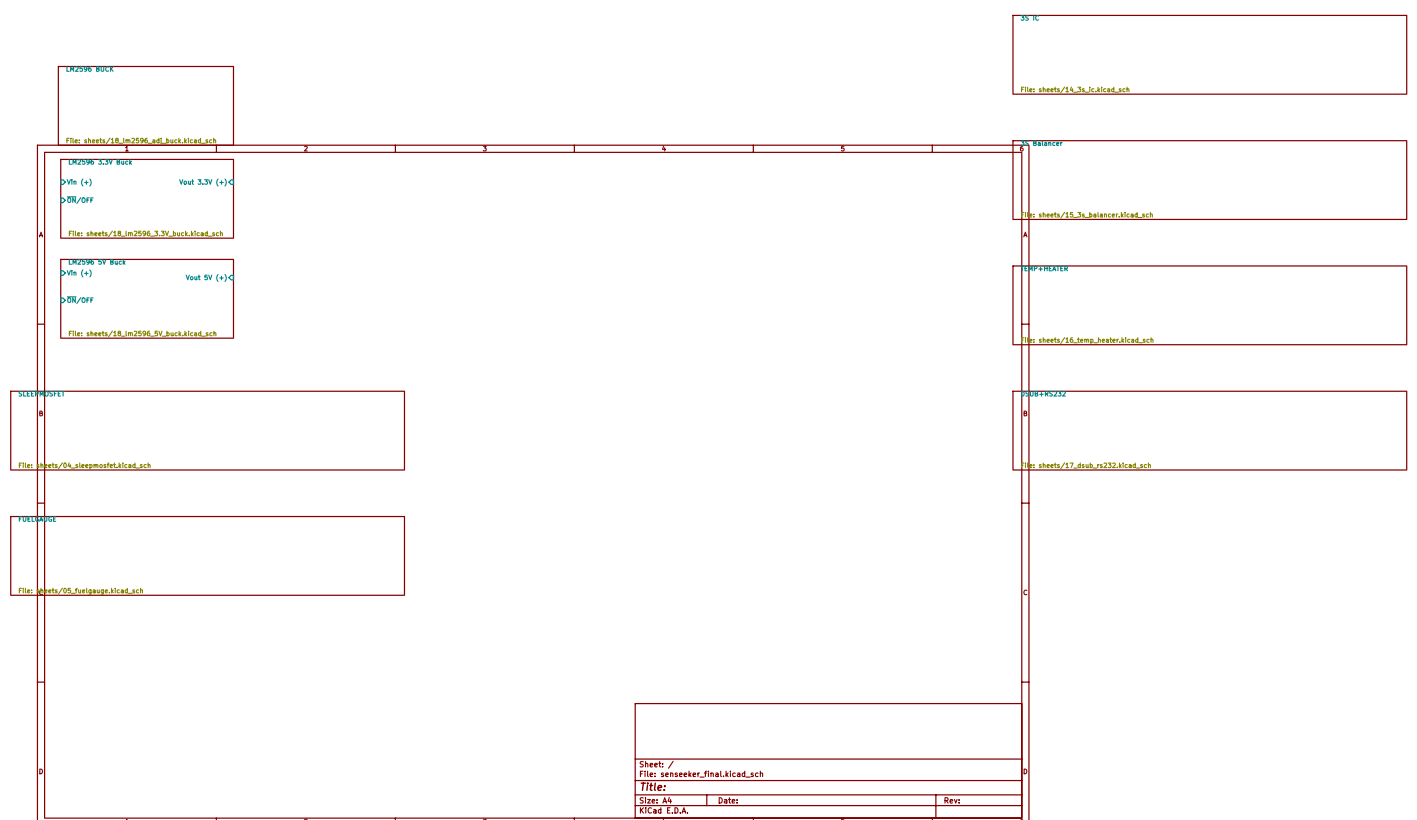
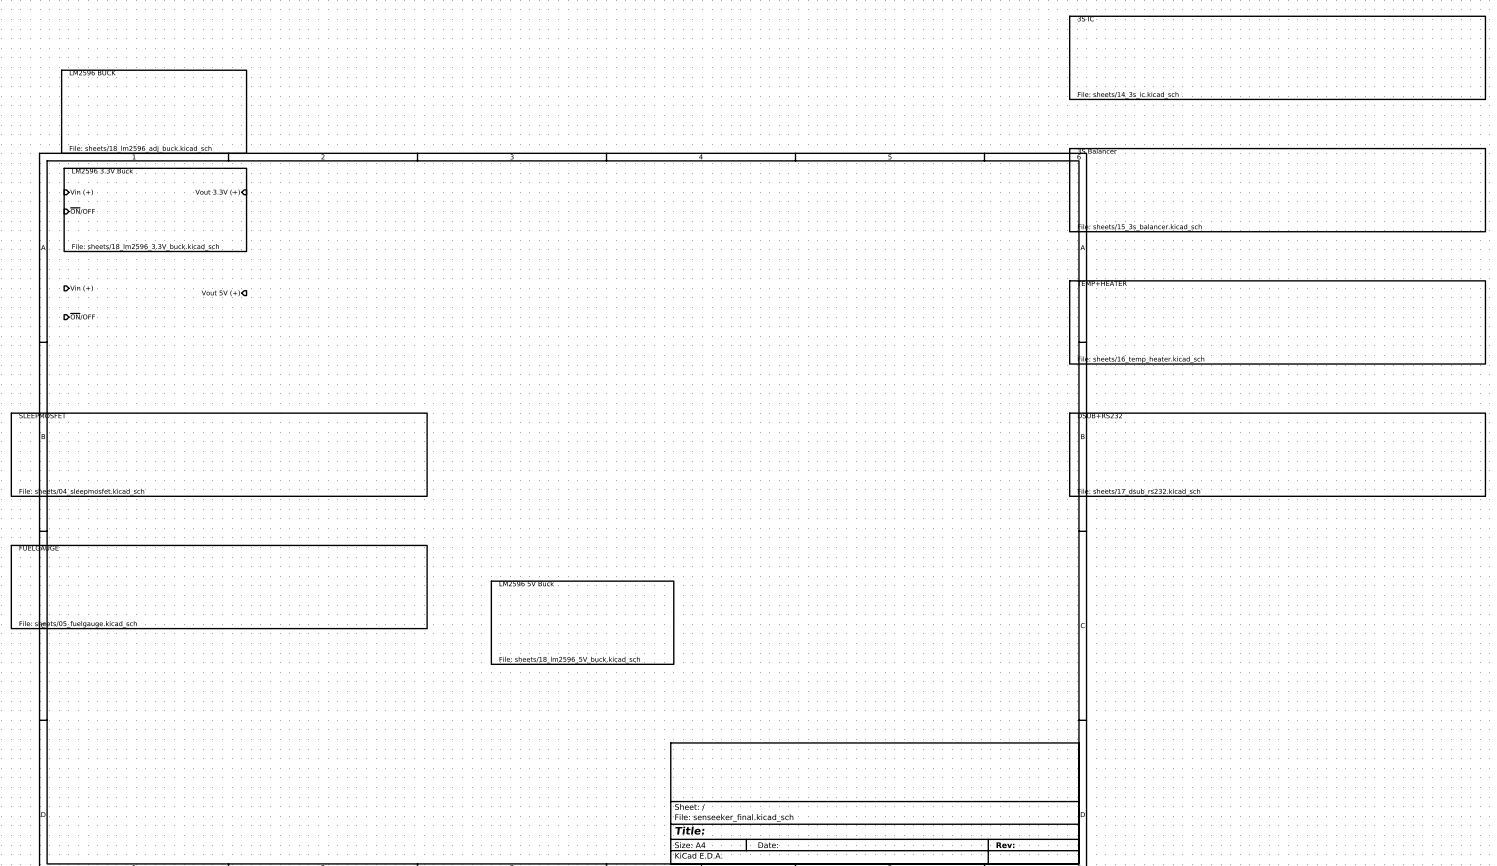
sheet position: (147, 298) -> (582, 622)

